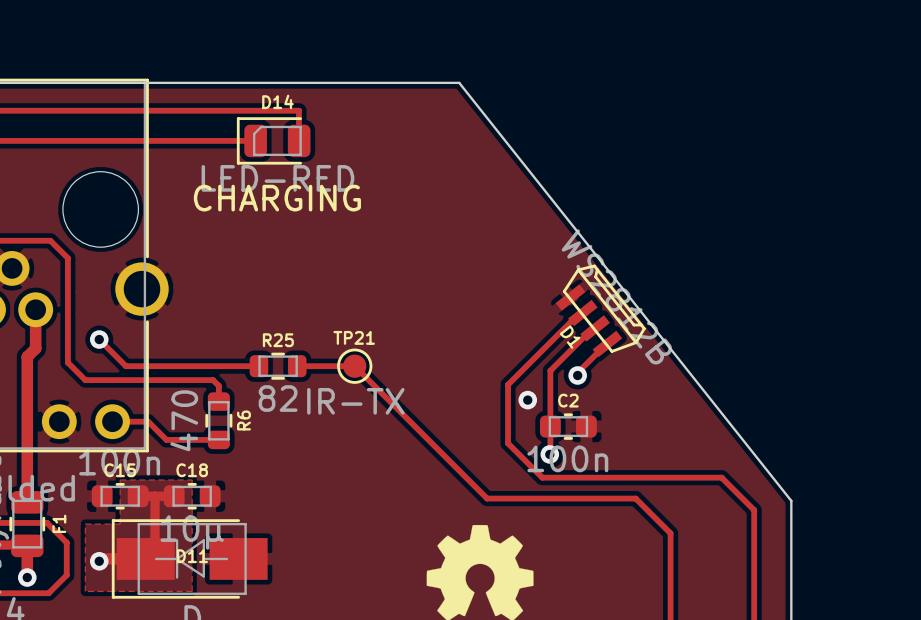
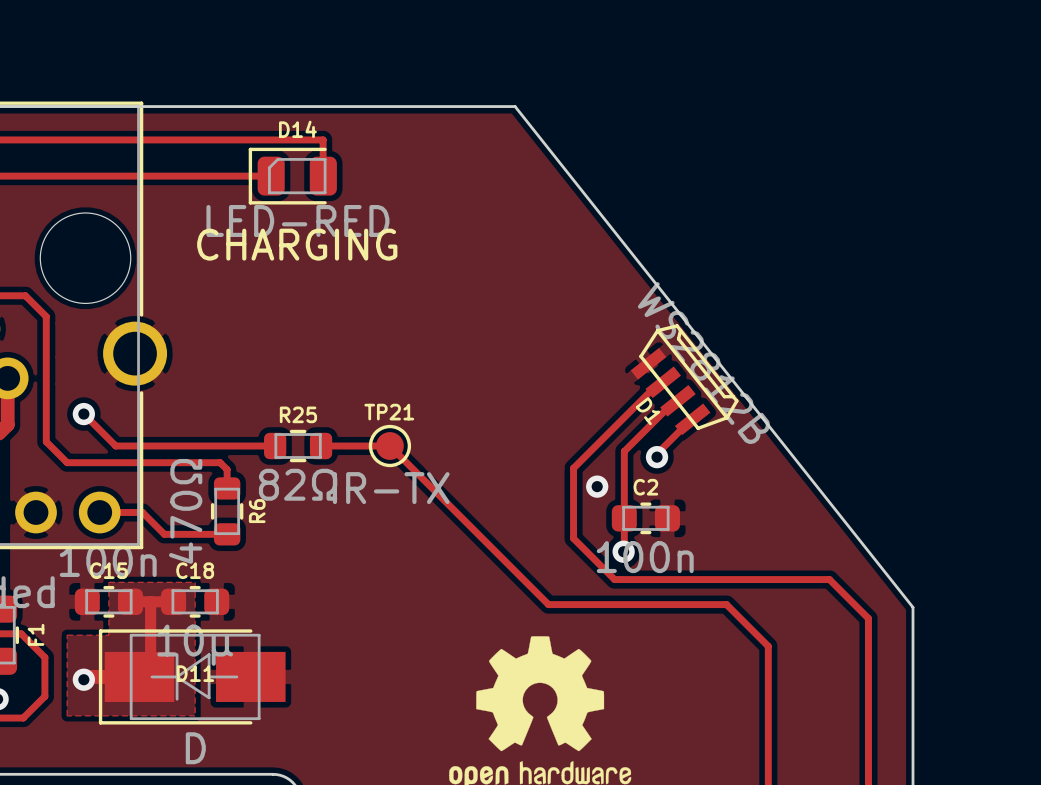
R25 value: 82 (278, 398) -> 82Ω (298, 484)
R6 value: 470 (184, 420) -> 470Ω (185, 511)

